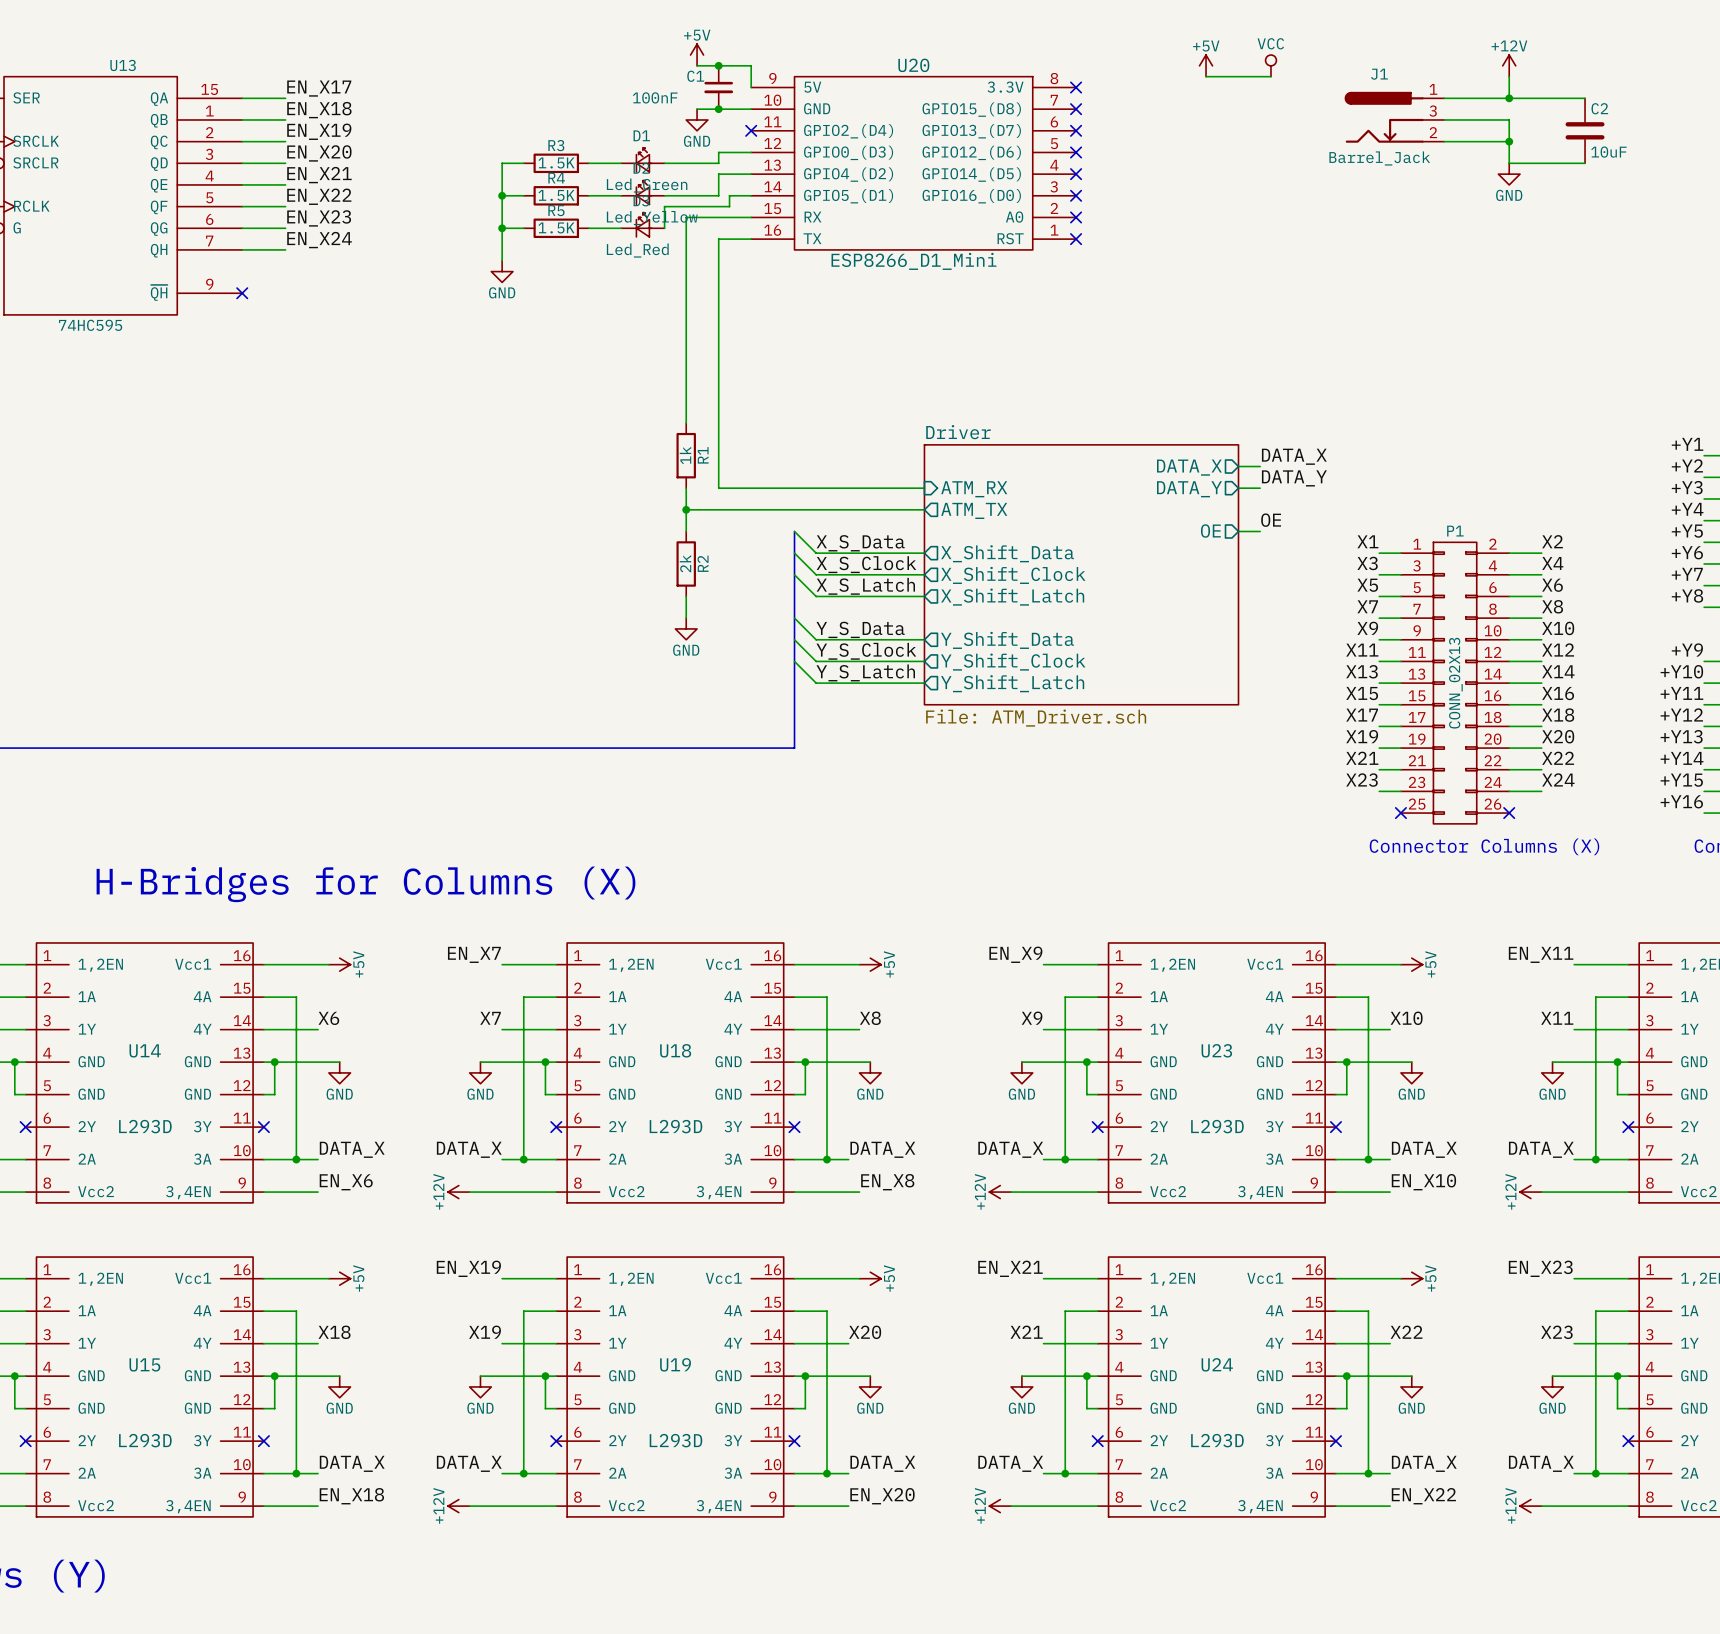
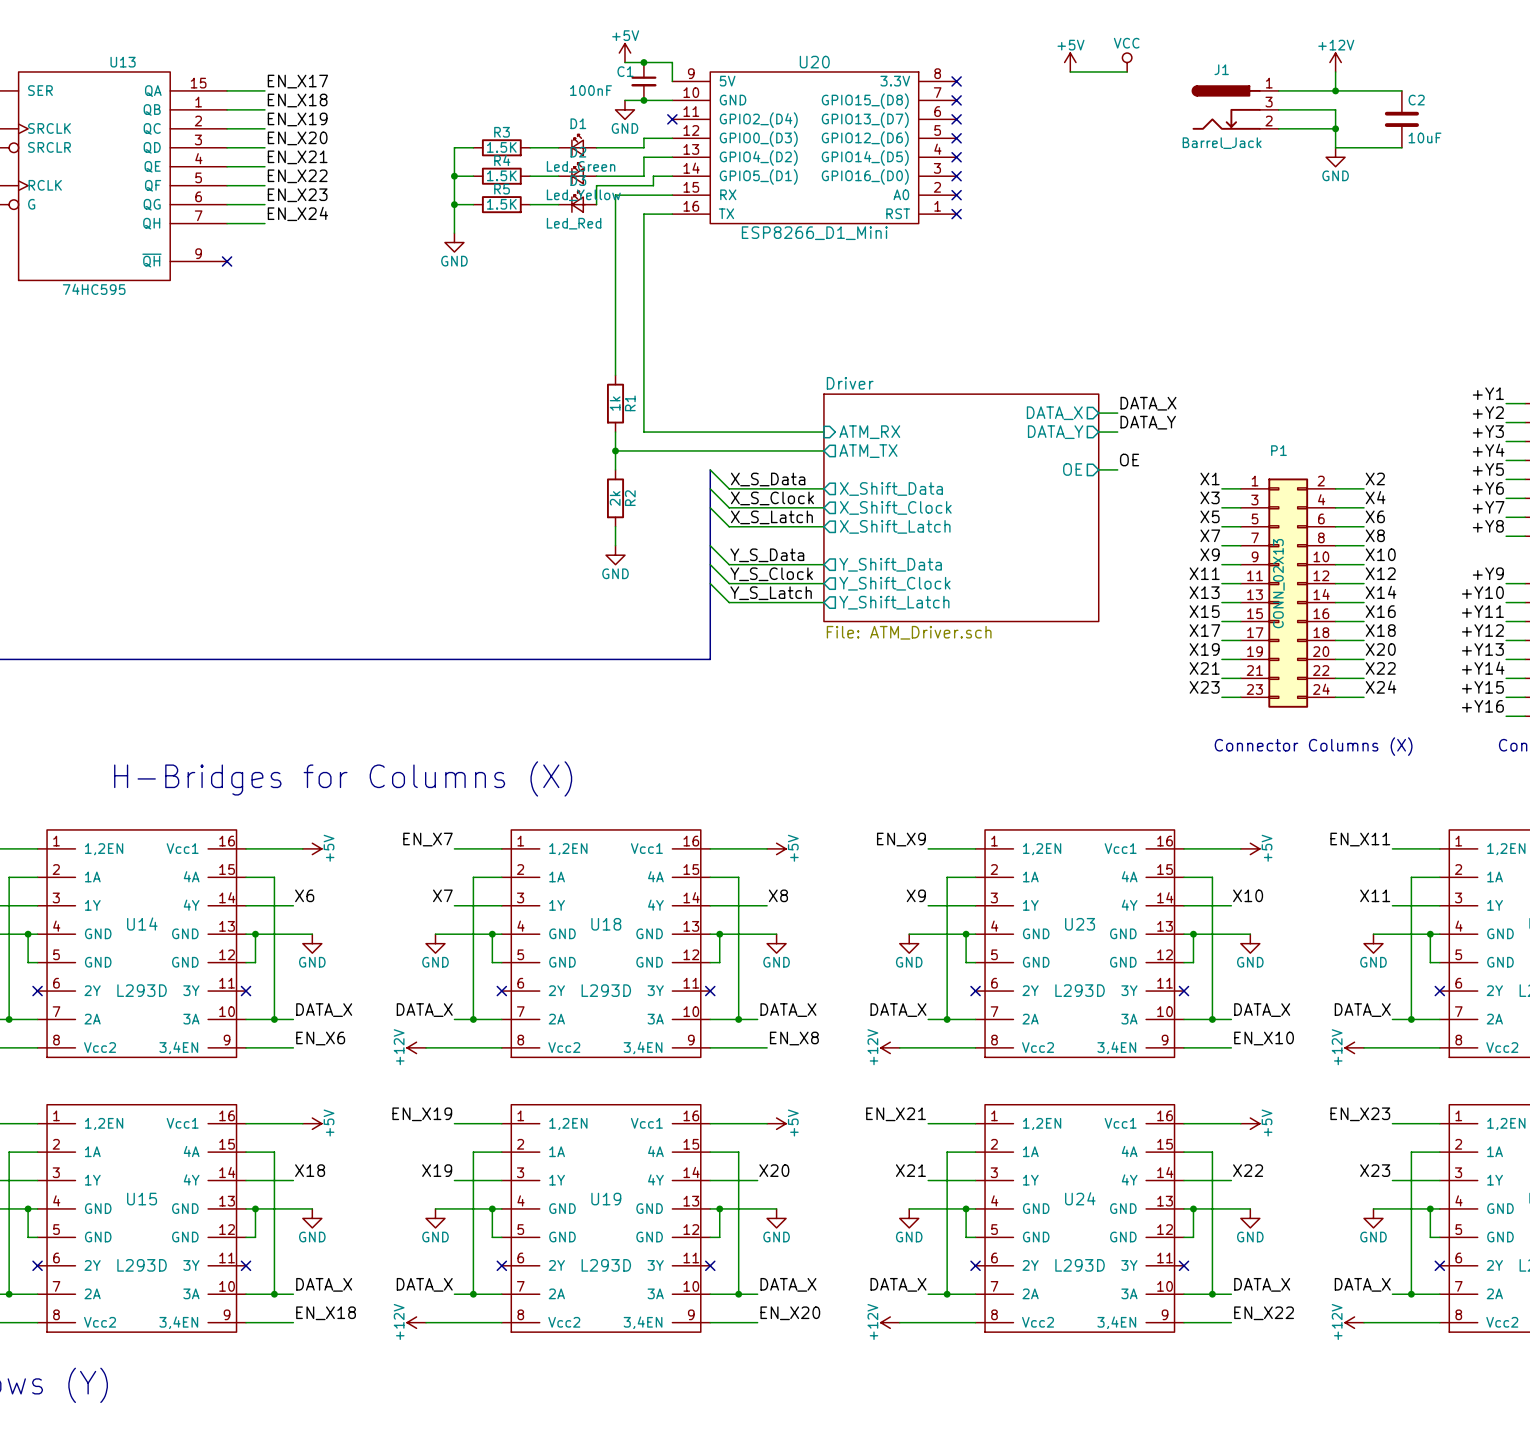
P1 symbol: [1400, 542, 1510, 824] -> [1240, 478, 1336, 708]
no-connect mark: (1400, 813) -> none
no-connect mark: (1509, 813) -> none

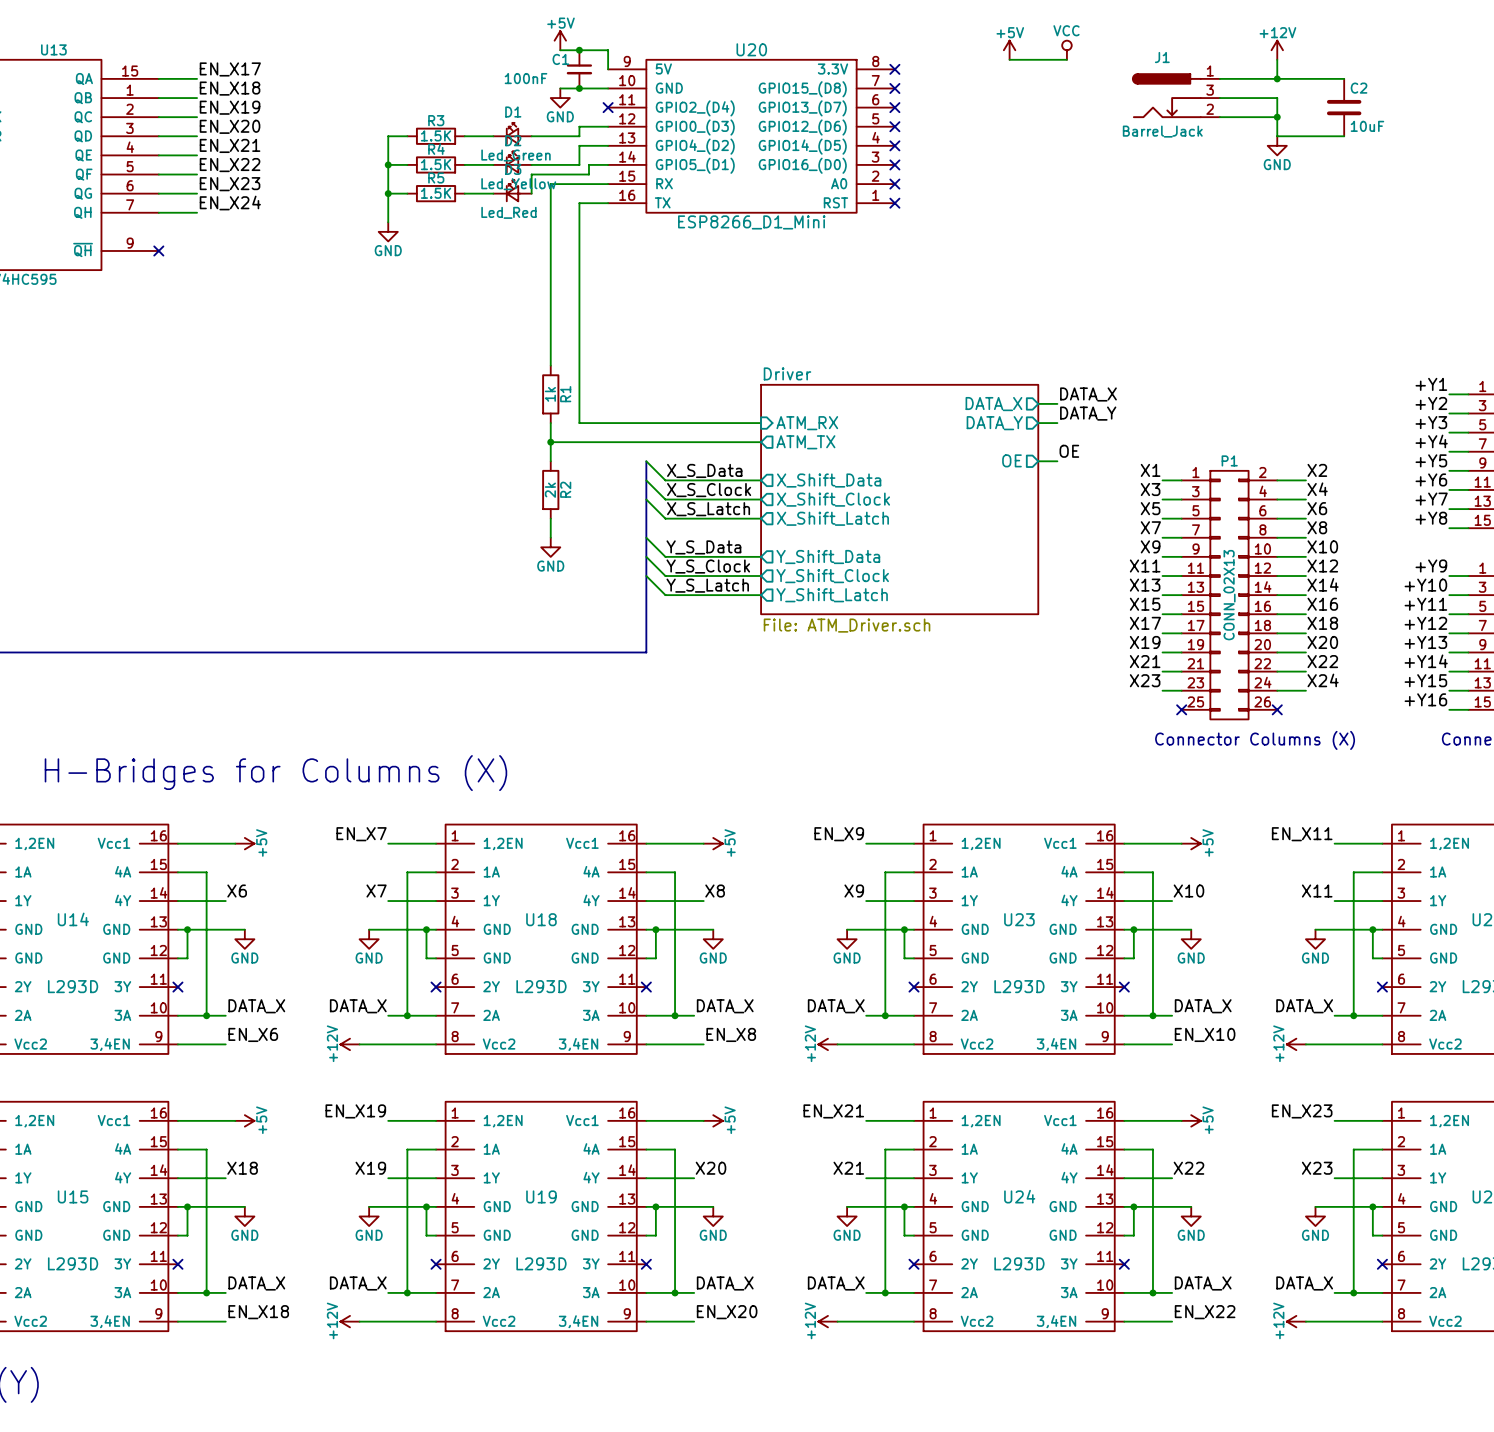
P1 symbol: [1240, 478, 1336, 708] -> [1181, 470, 1278, 720]
no-connect mark: none -> (1181, 709)
no-connect mark: none -> (1277, 709)

